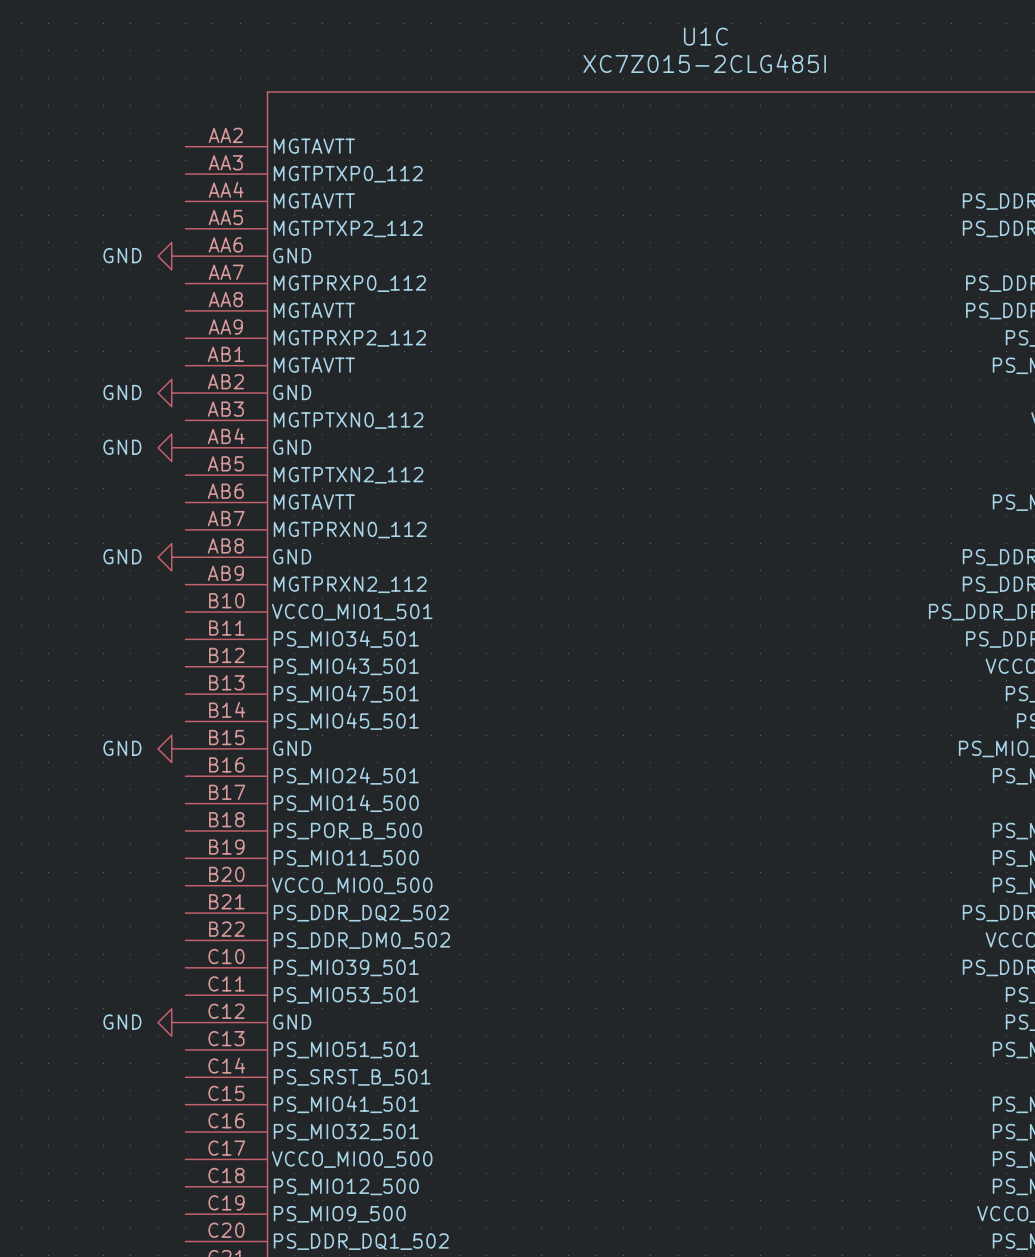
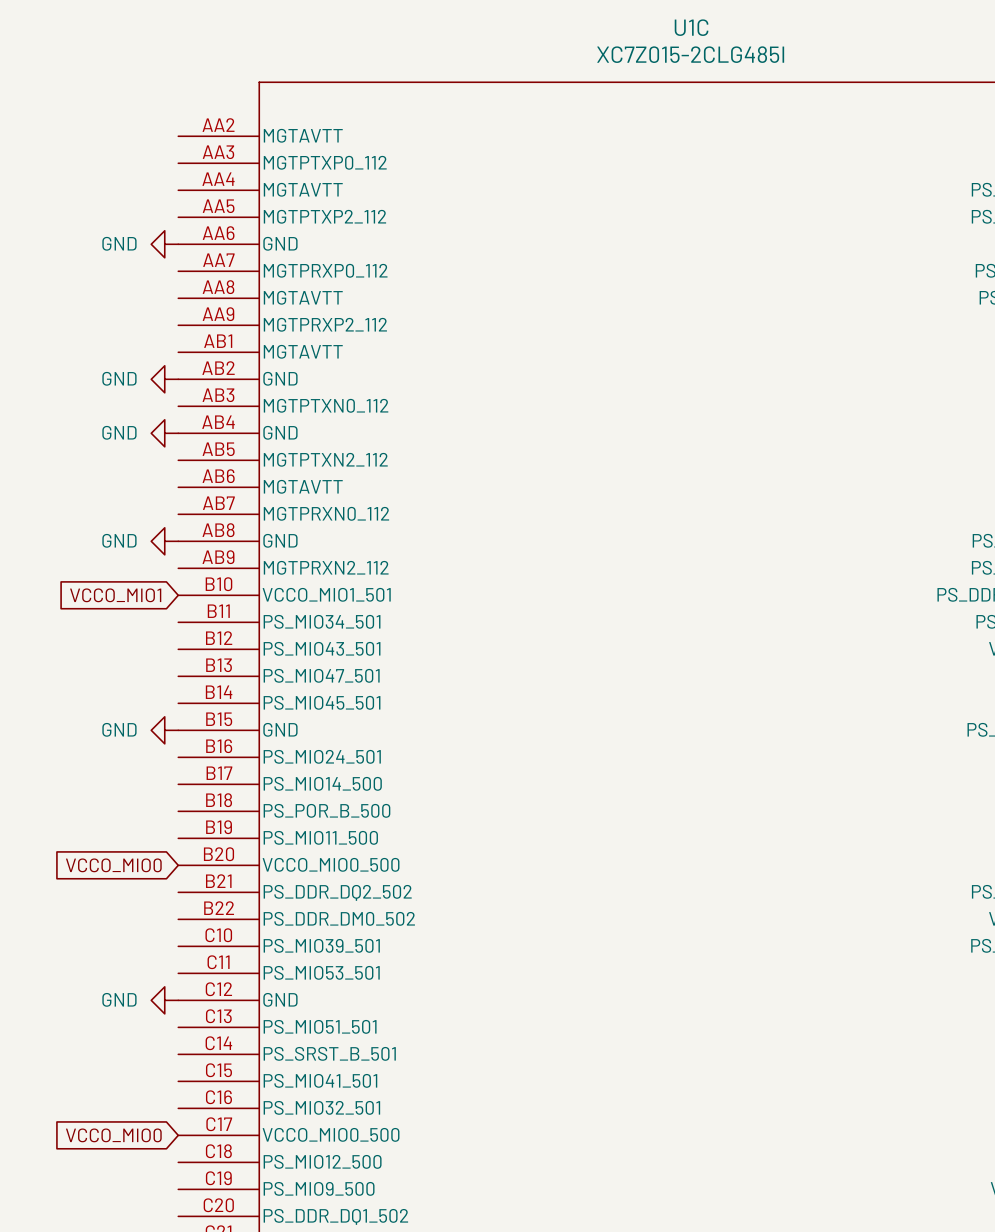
global label: none -> VCCO_MIO1 (115, 595)
global label: none -> VCCO_MIO0 (113, 865)
global label: none -> VCCO_MIO0 (113, 1135)

